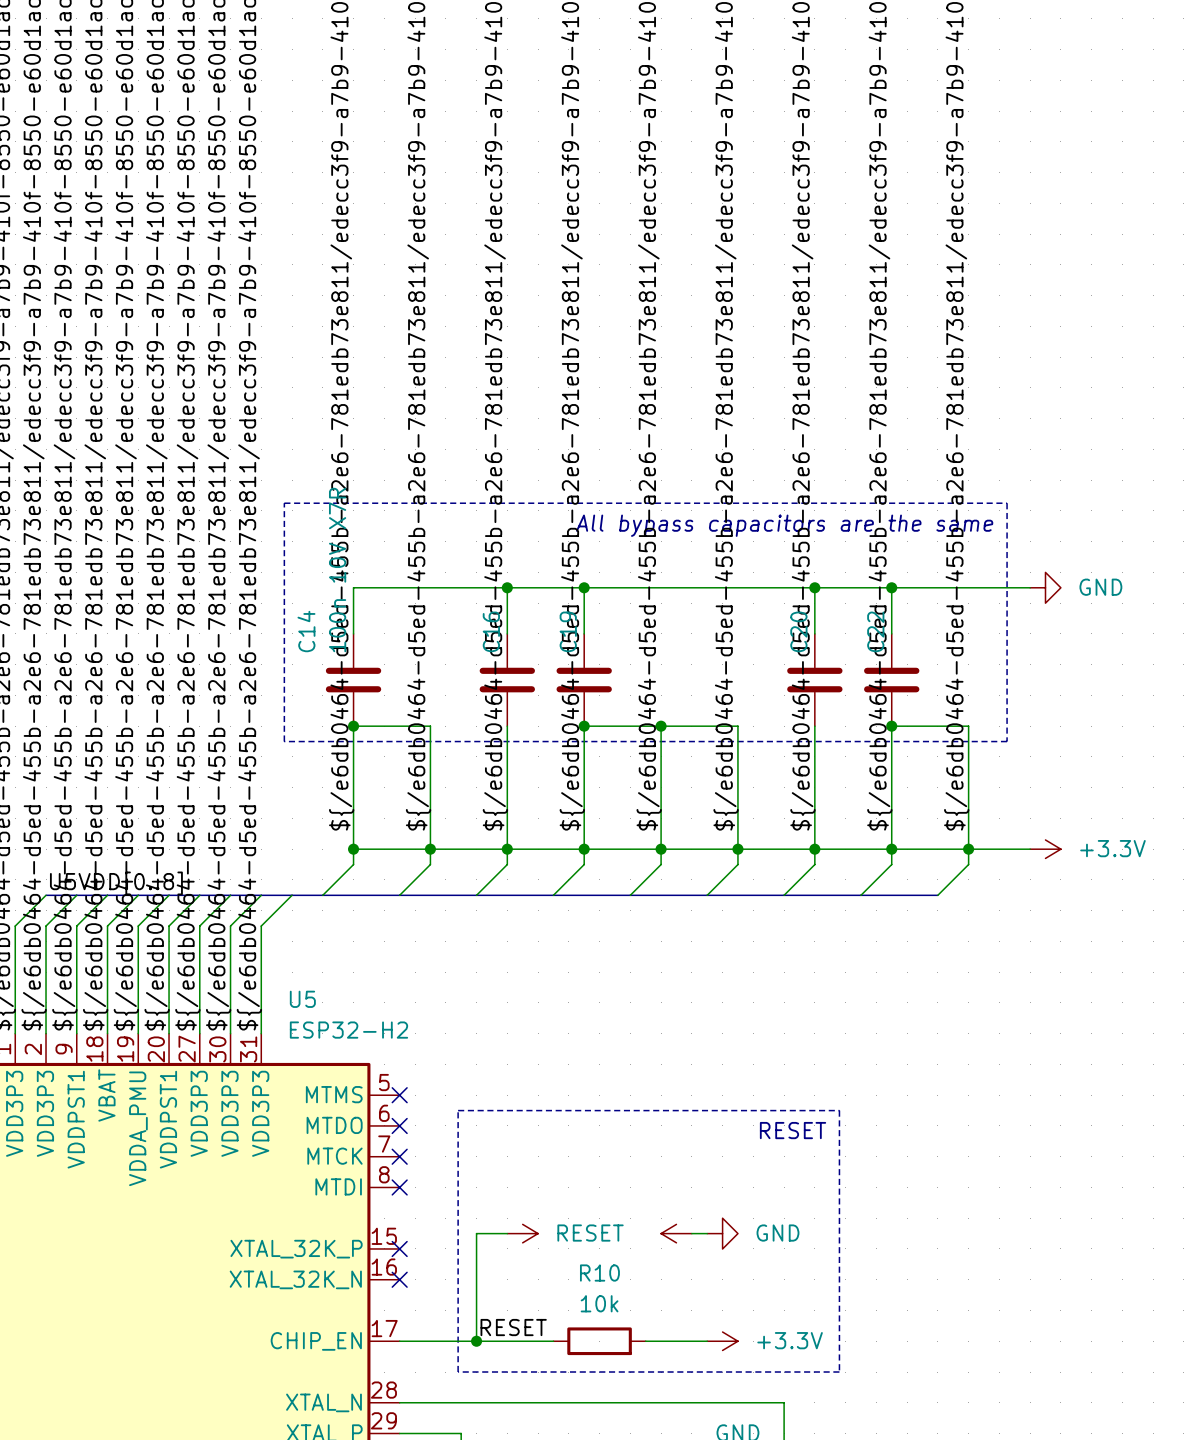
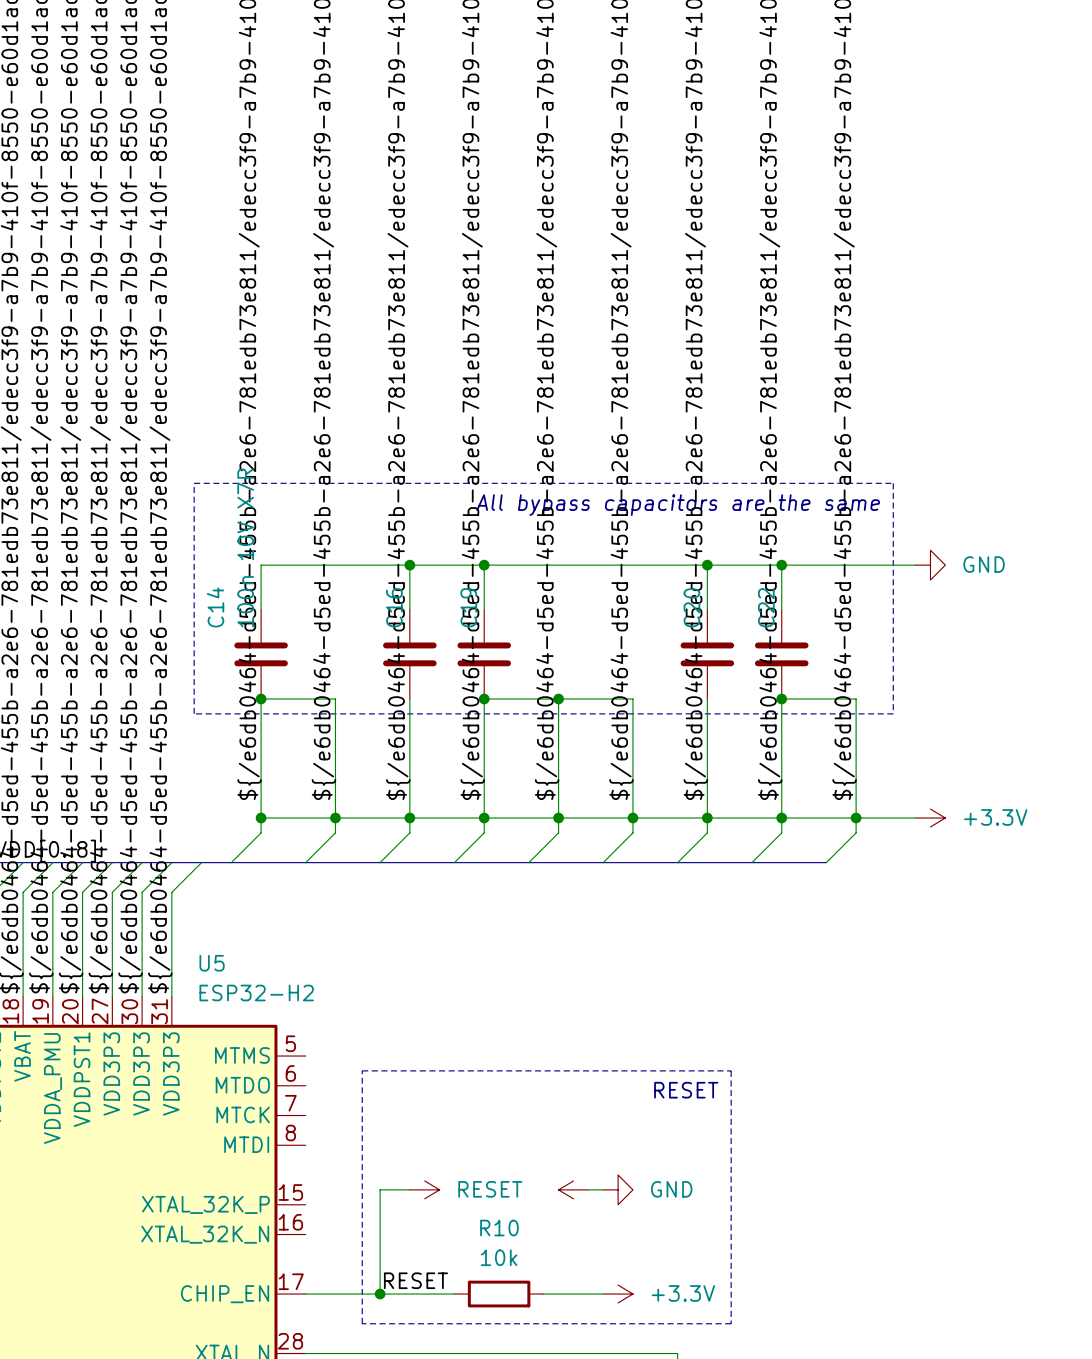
no-connect mark: (399, 1095) -> none
no-connect mark: (399, 1125) -> none
no-connect mark: (399, 1156) -> none
no-connect mark: (399, 1187) -> none
no-connect mark: (399, 1248) -> none
no-connect mark: (399, 1279) -> none

